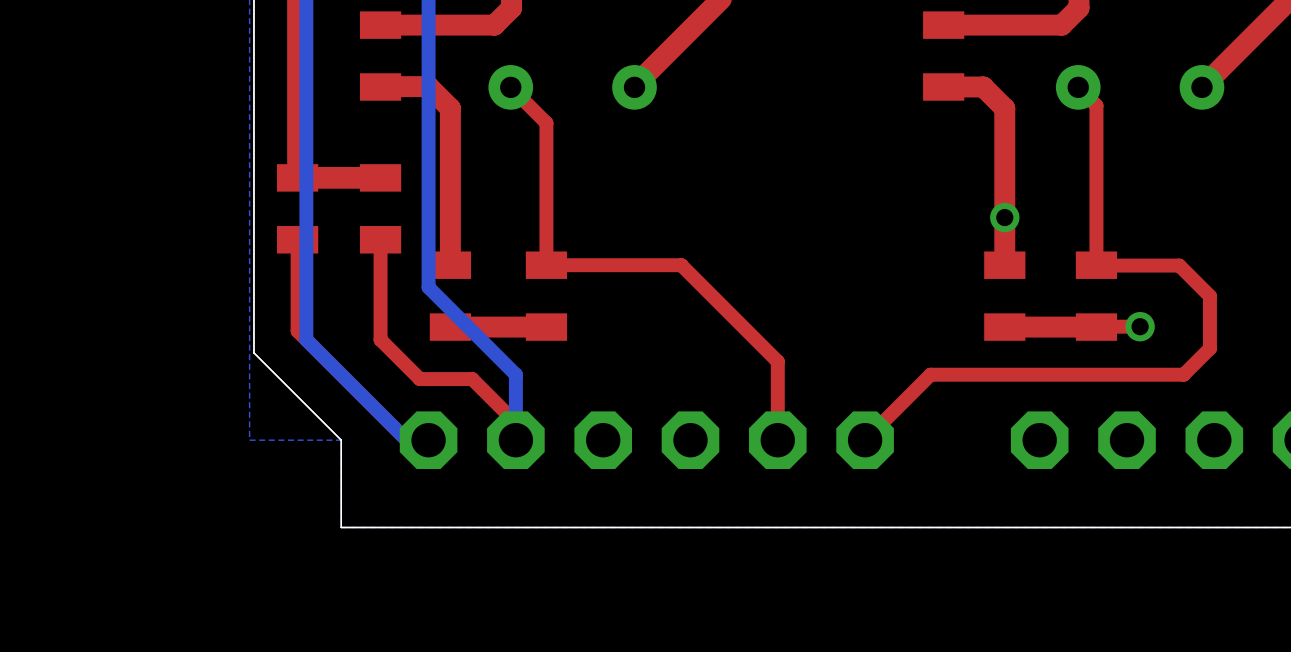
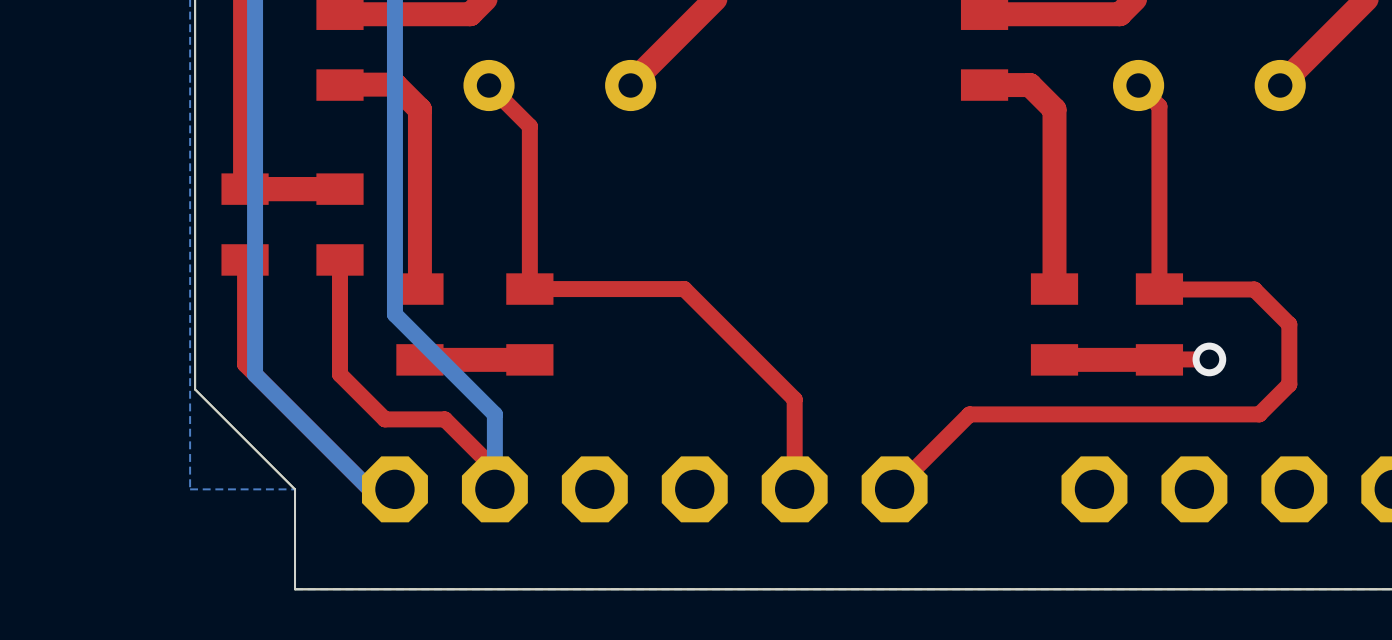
via: (1004, 217) -> none

